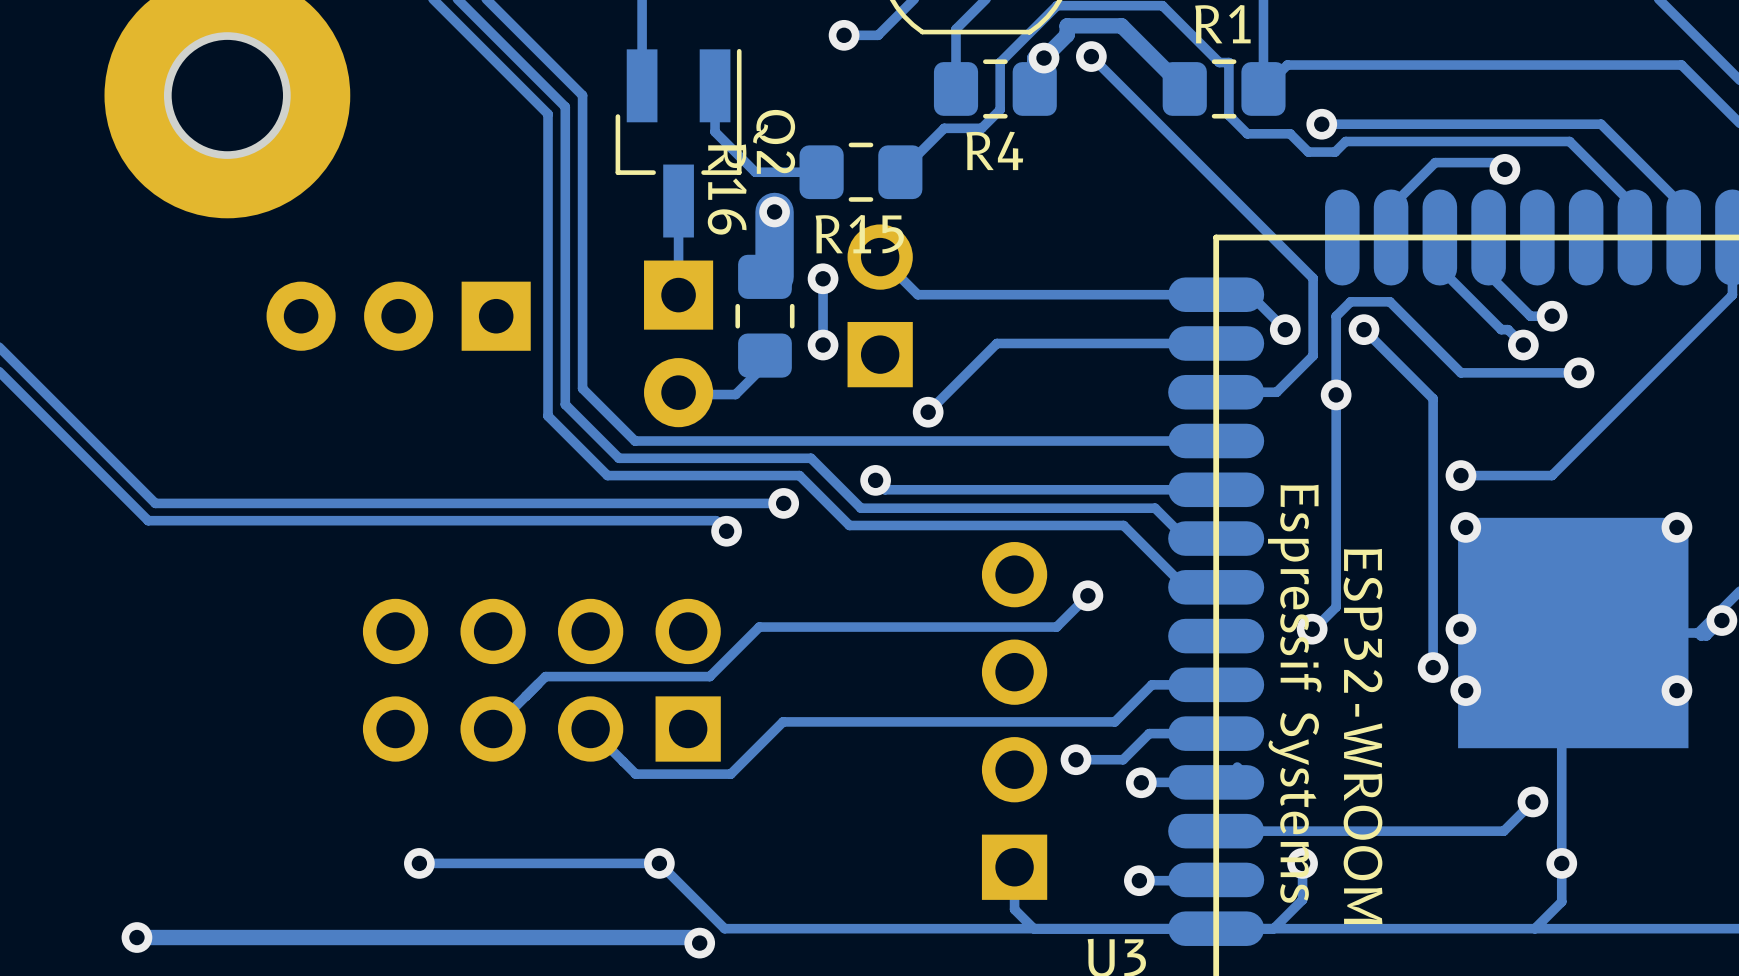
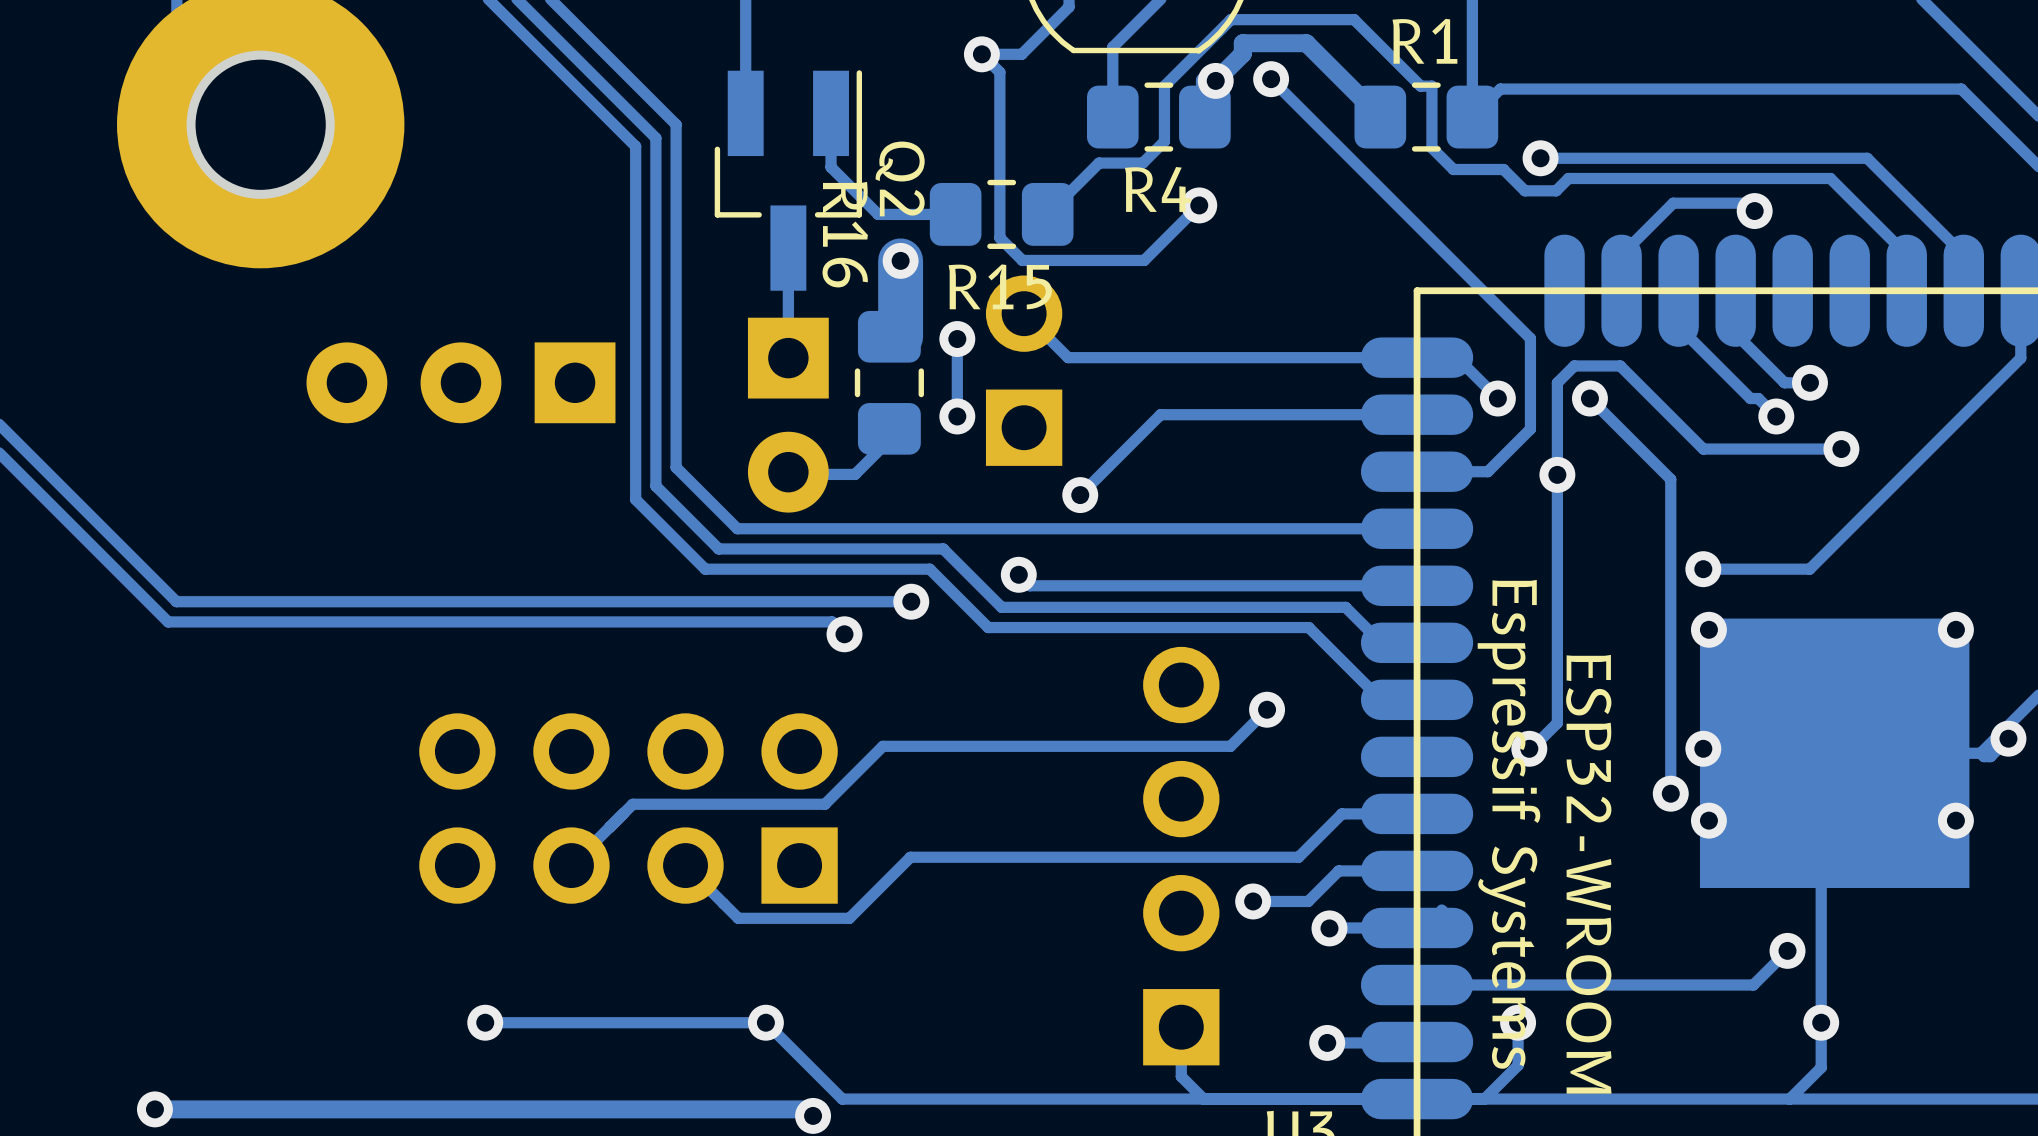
track: none -> (981, 54) (999, 72) (999, 237) (1022, 260) (1144, 260) (1199, 205)
via: none -> (1199, 205)

